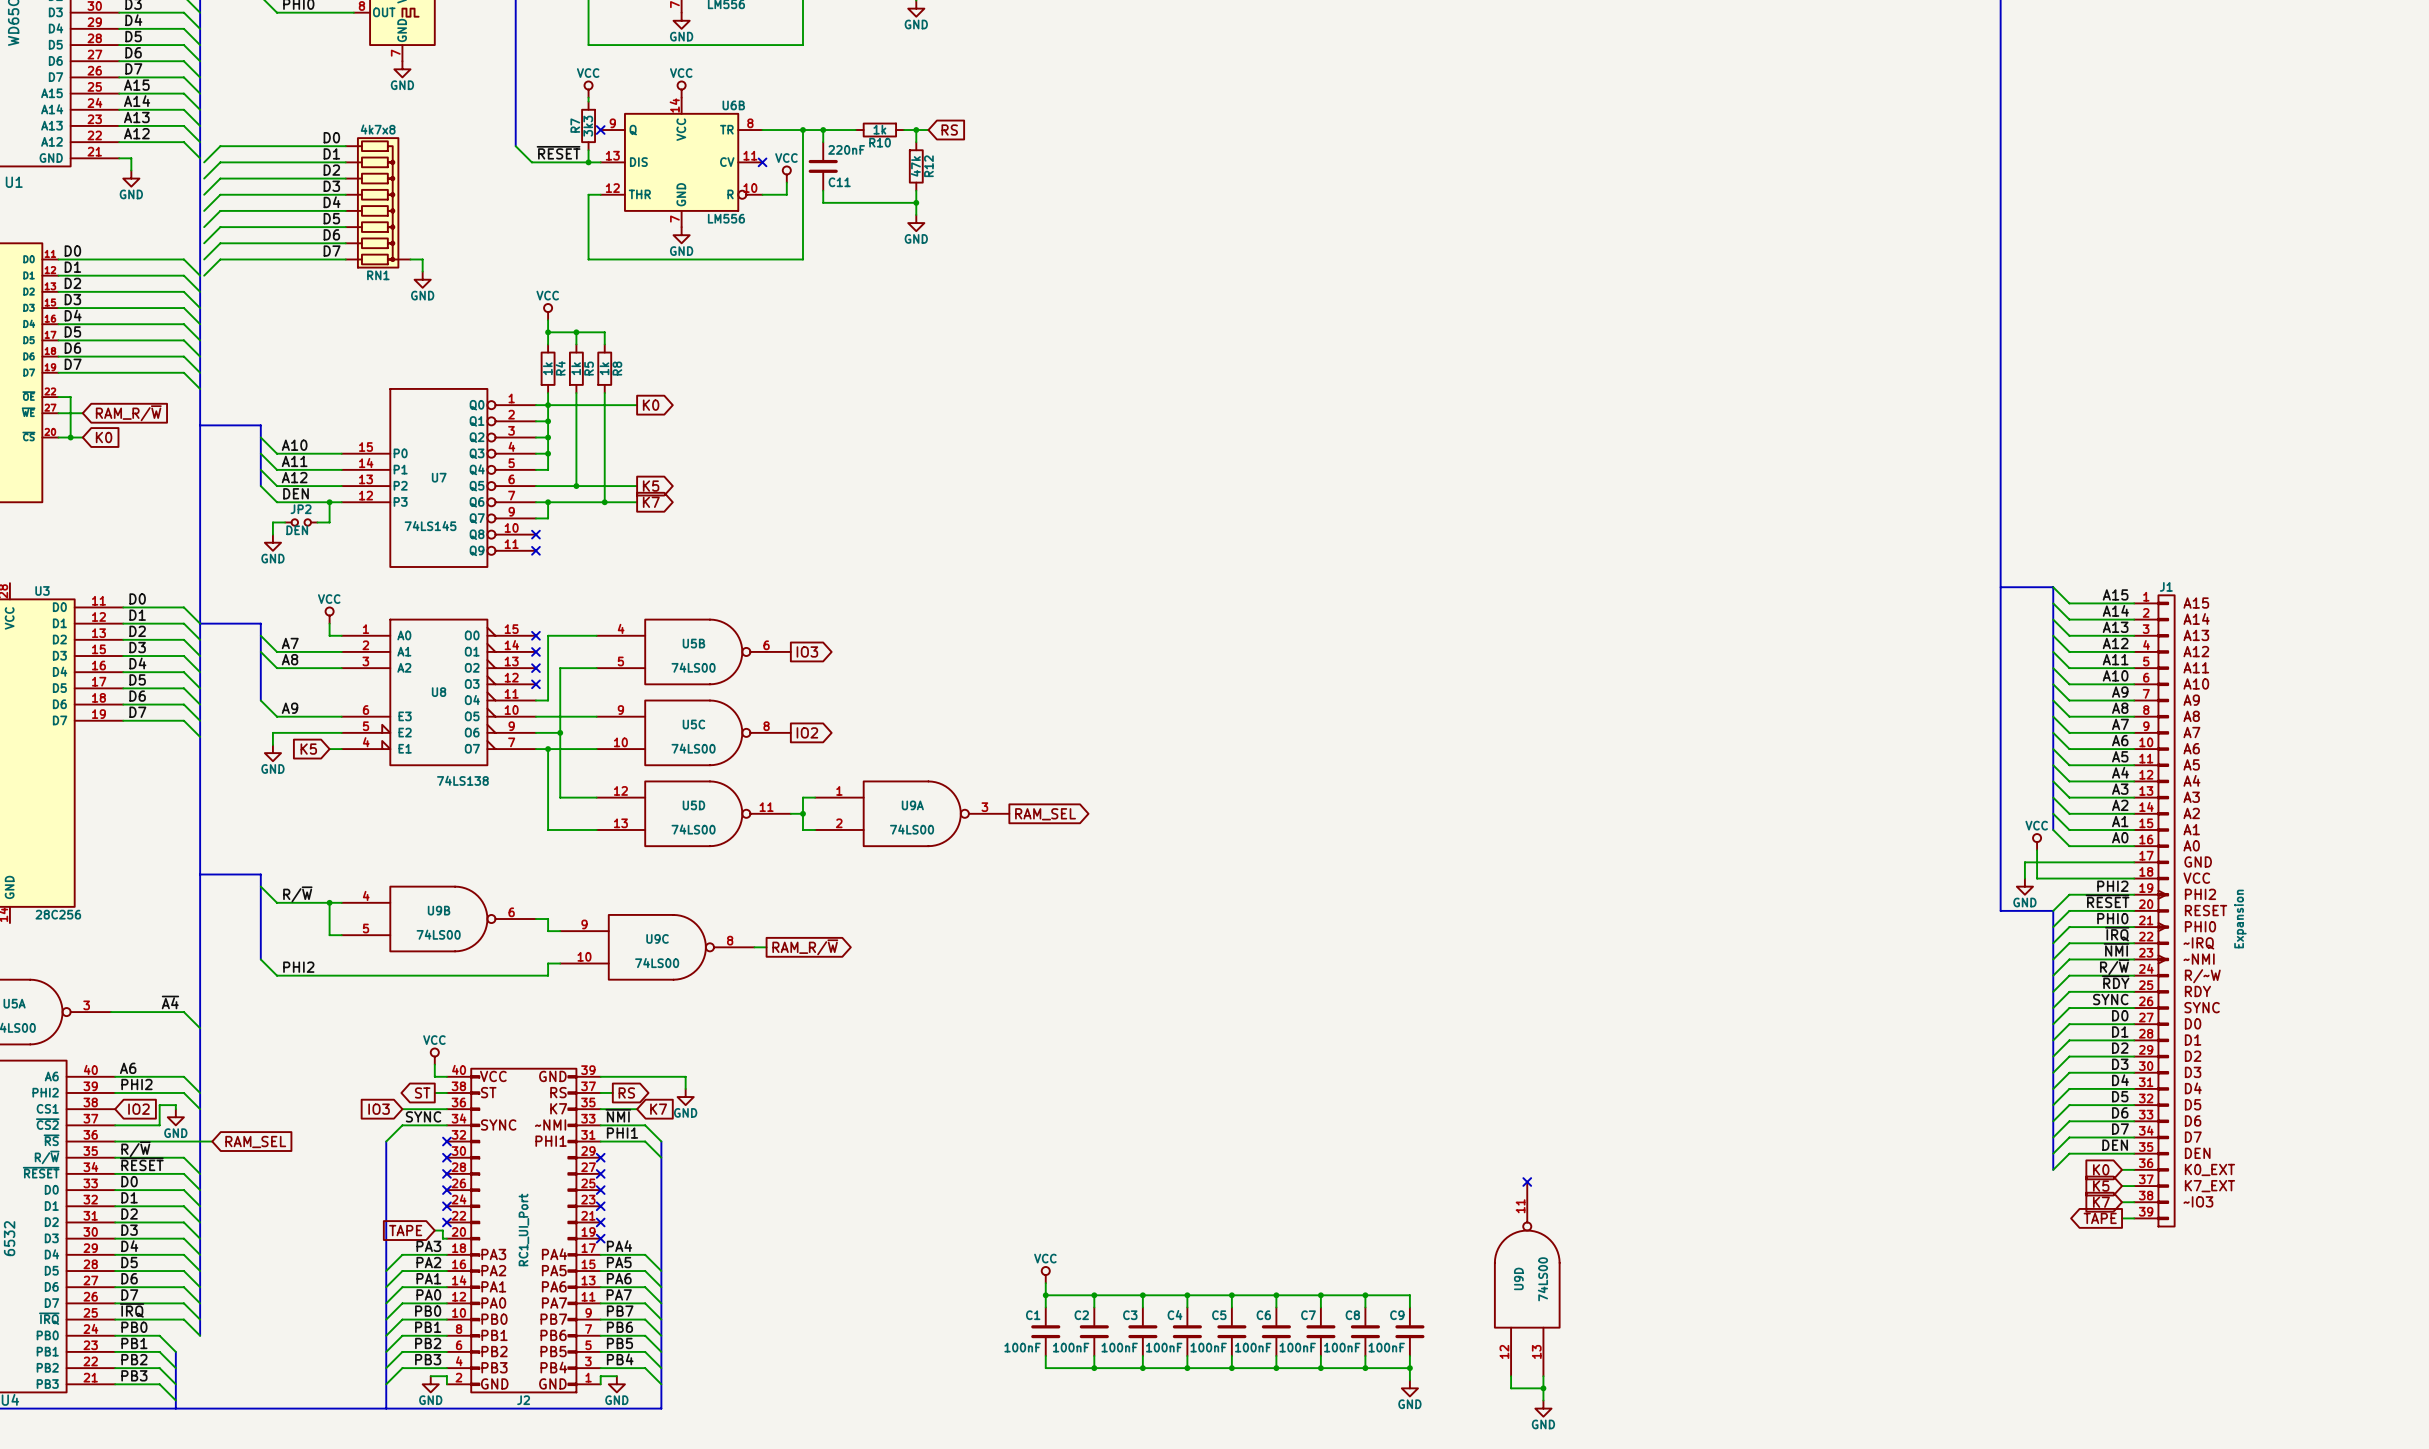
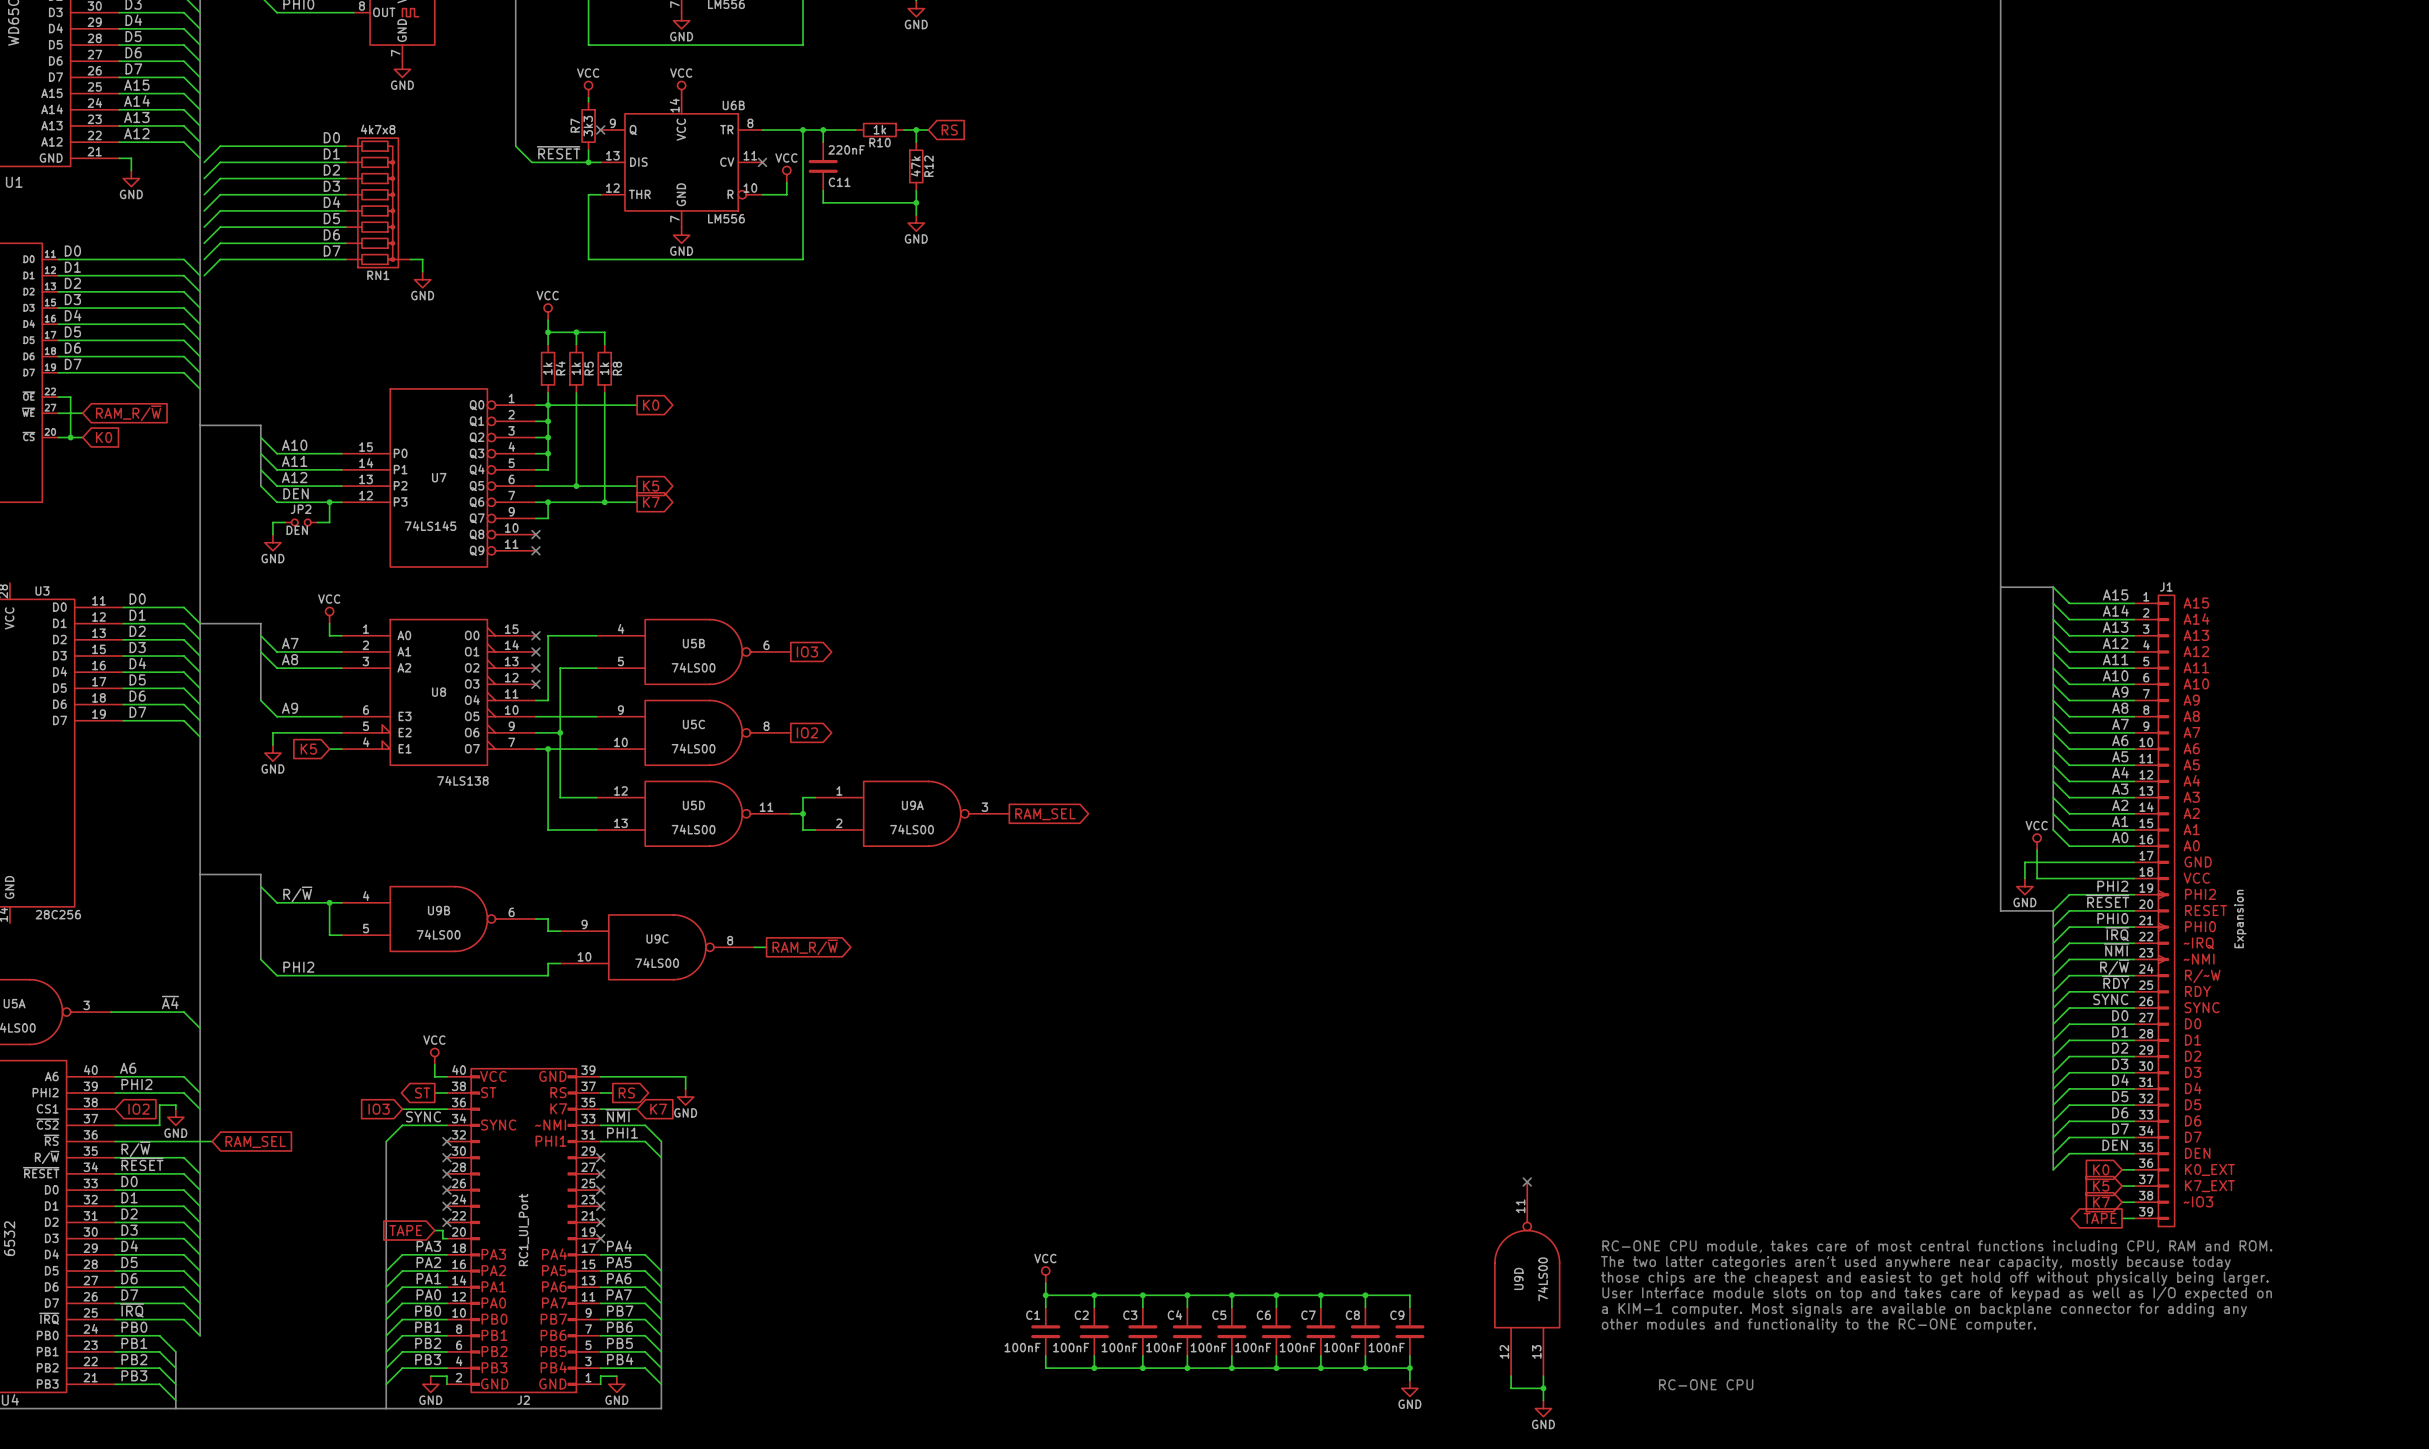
text: none -> RC-ONE CPU module, takes care of most central functions including CPU, RAM and ROM. (1937, 1247)
text: none -> The two latter categories aren't used anywhere near capacity, mostly because today (1915, 1263)
text: none -> those chips are the cheapest and easiest to get hold off without physically being larger. (1934, 1278)
text: none -> User Interface module slots on top and takes care of keypad as well as I/O expected on (1937, 1294)
text: none -> a KIM-1 computer. Most signals are available on backplane connector for adding any (1924, 1310)
text: none -> other modules and functionality to the RC-ONE computer. (1818, 1325)
text: none -> RC-ONE CPU (1706, 1384)

